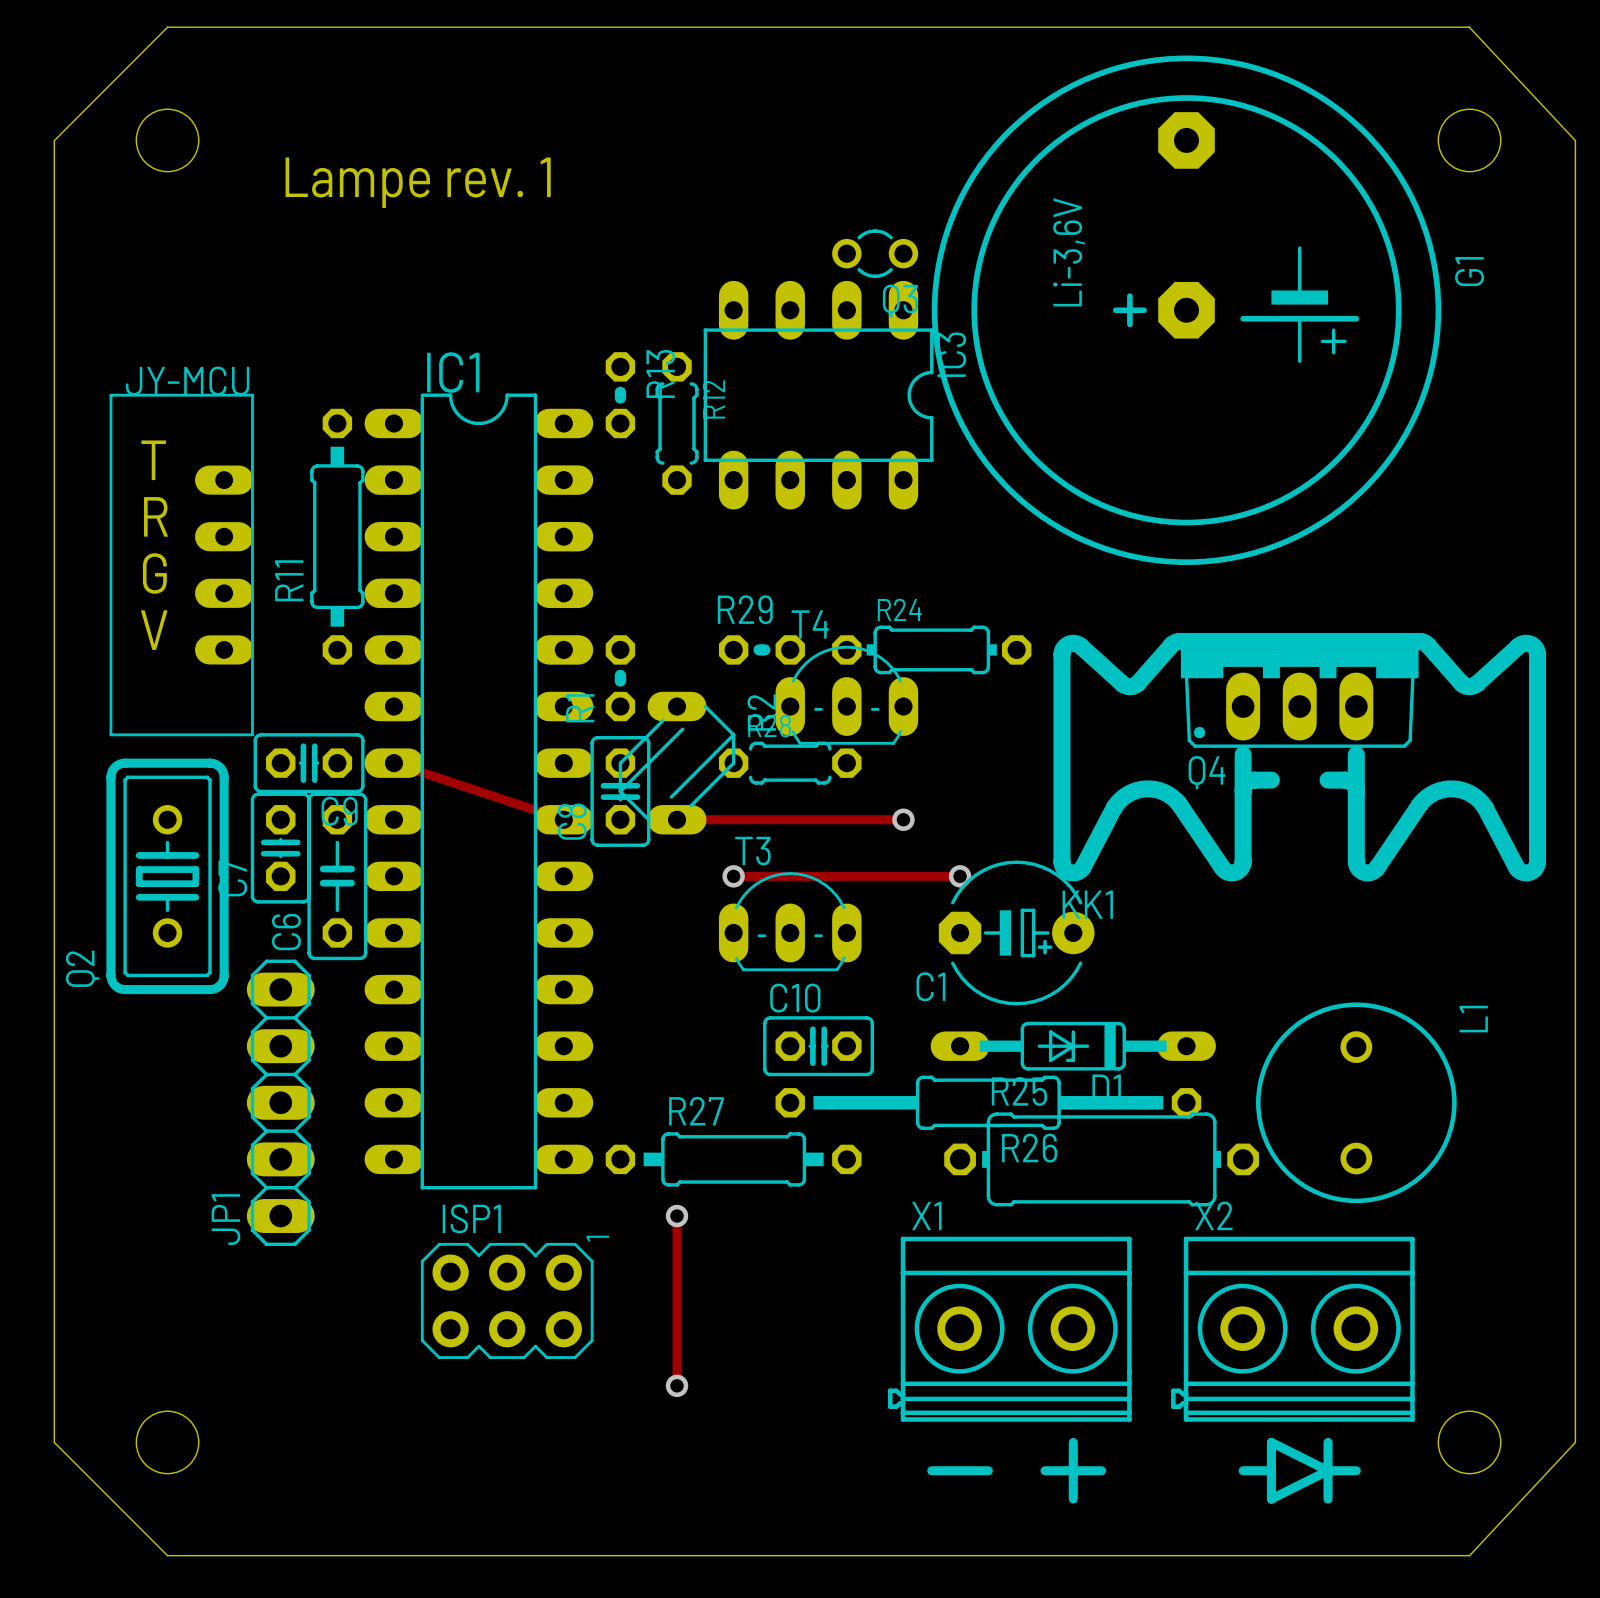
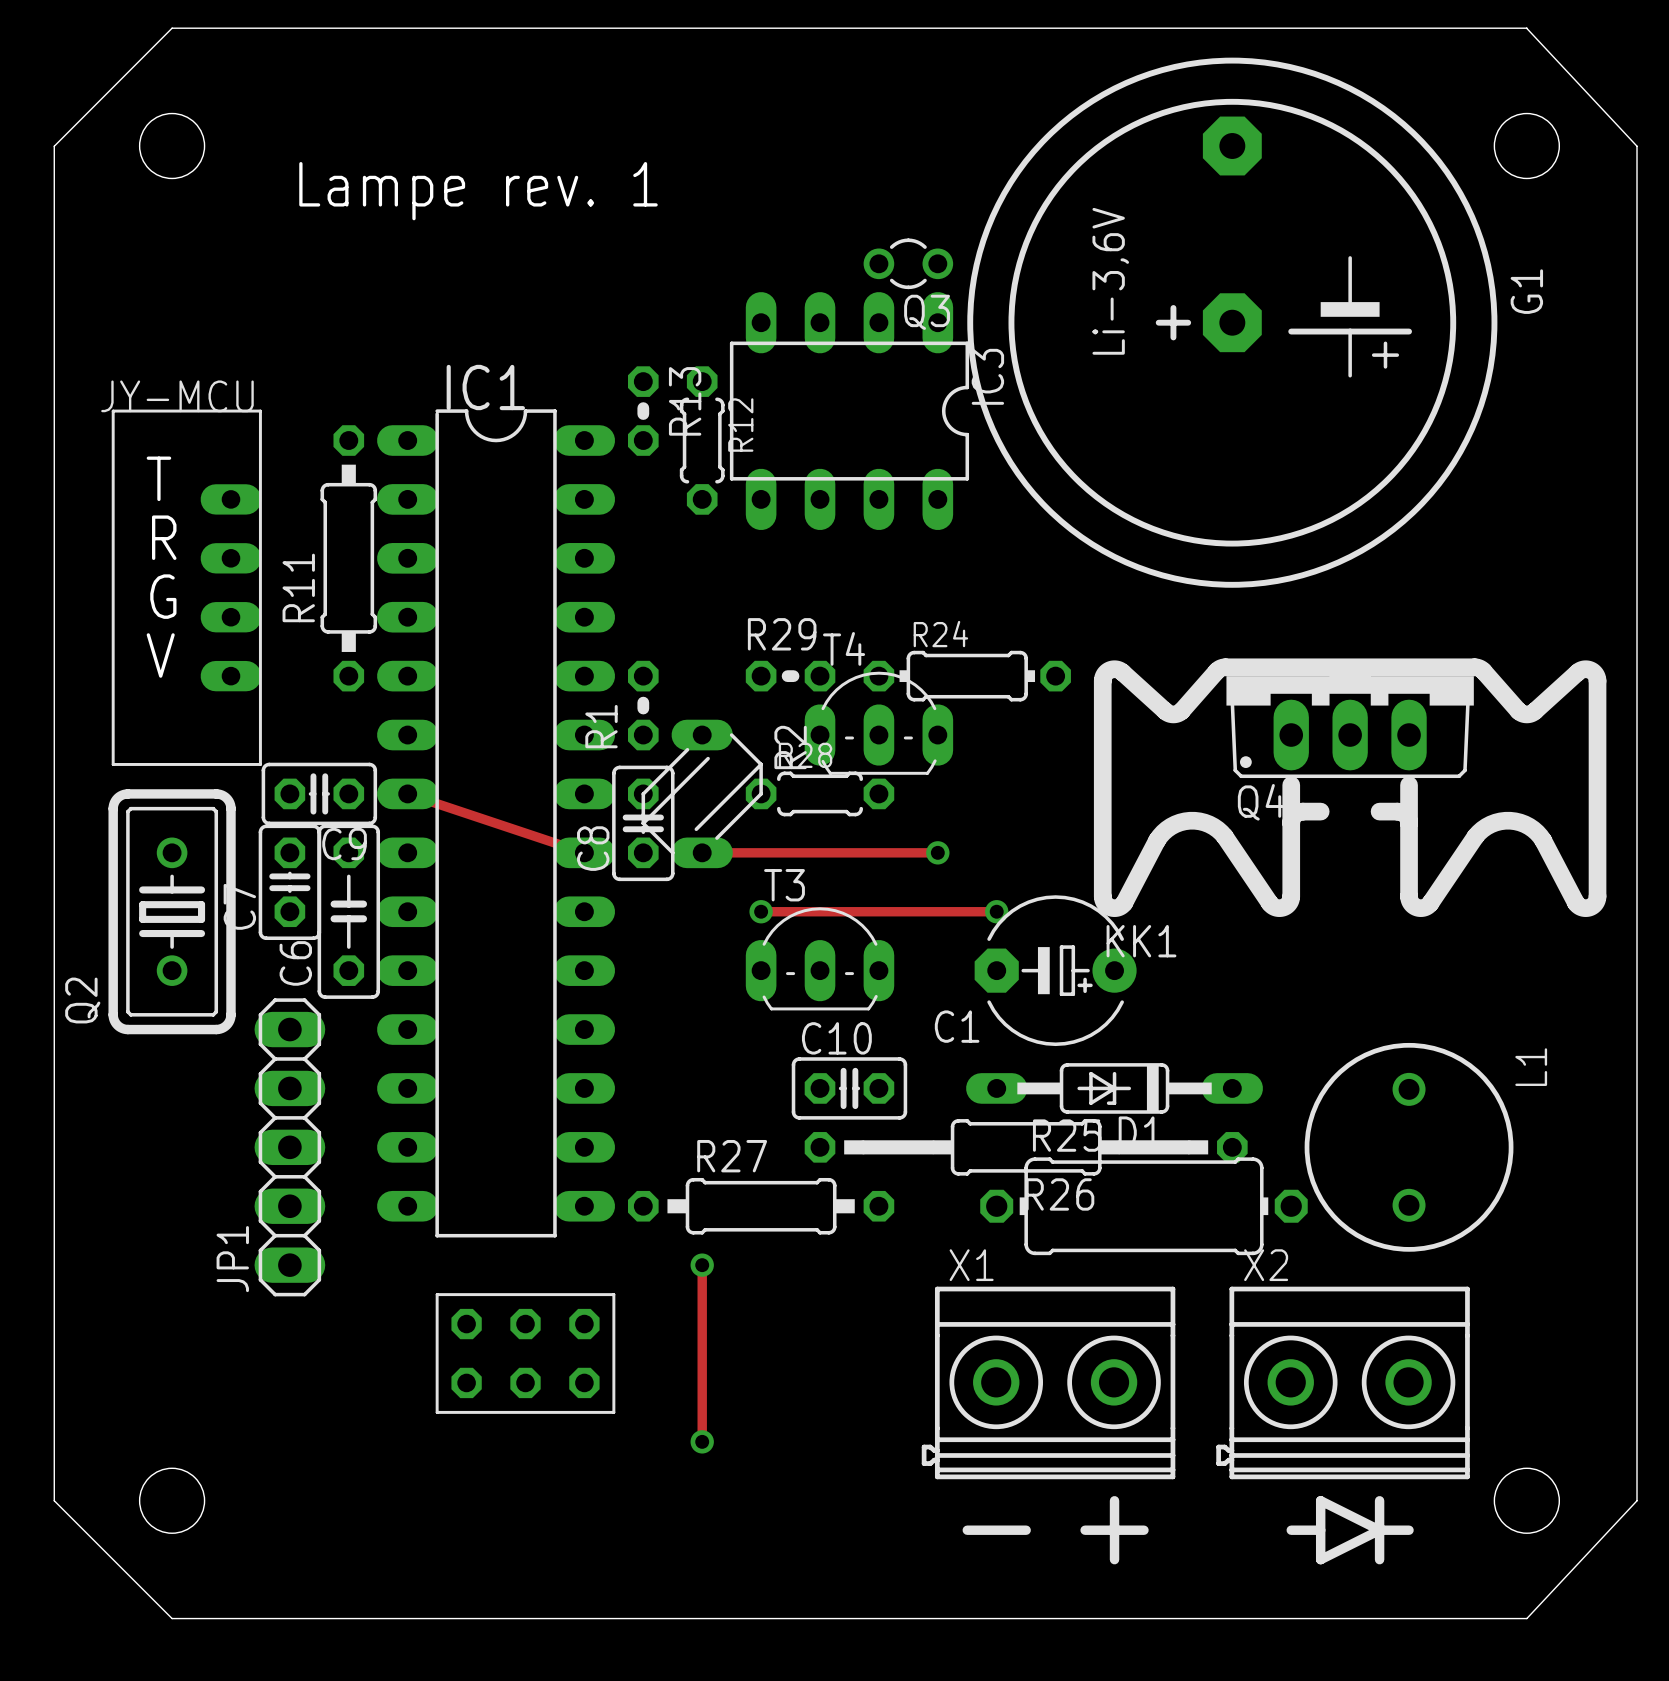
ISP1: (507, 1300) -> none
part: none -> (525, 1353)

